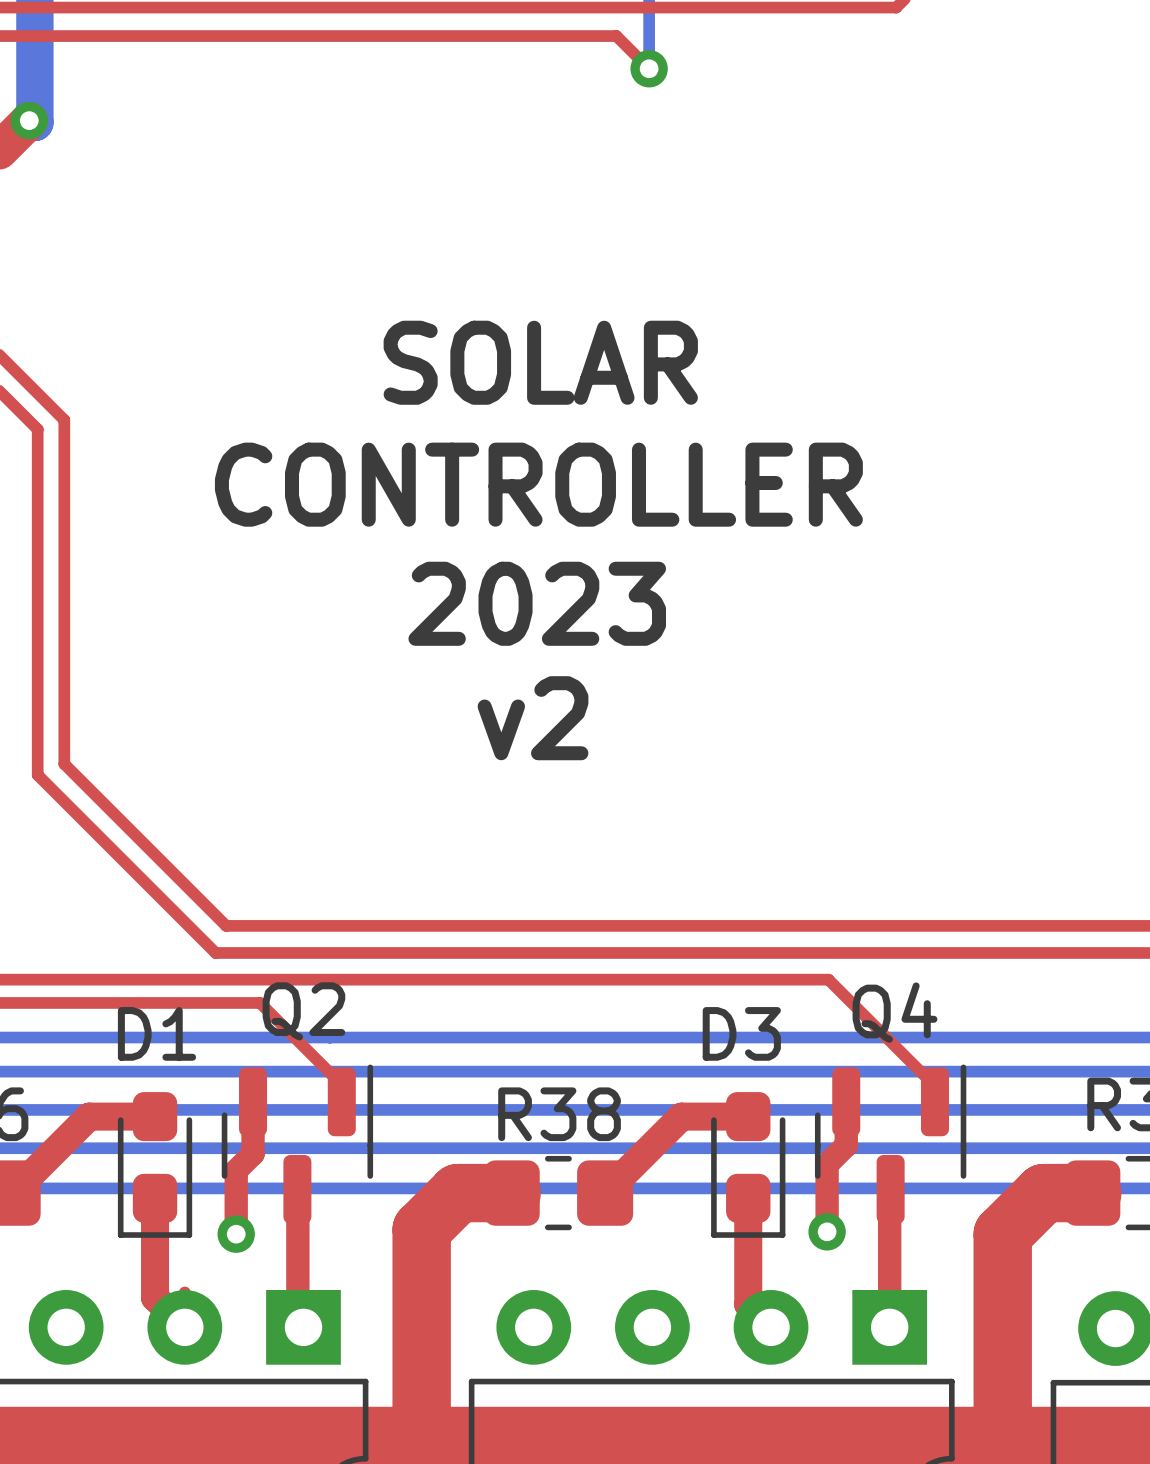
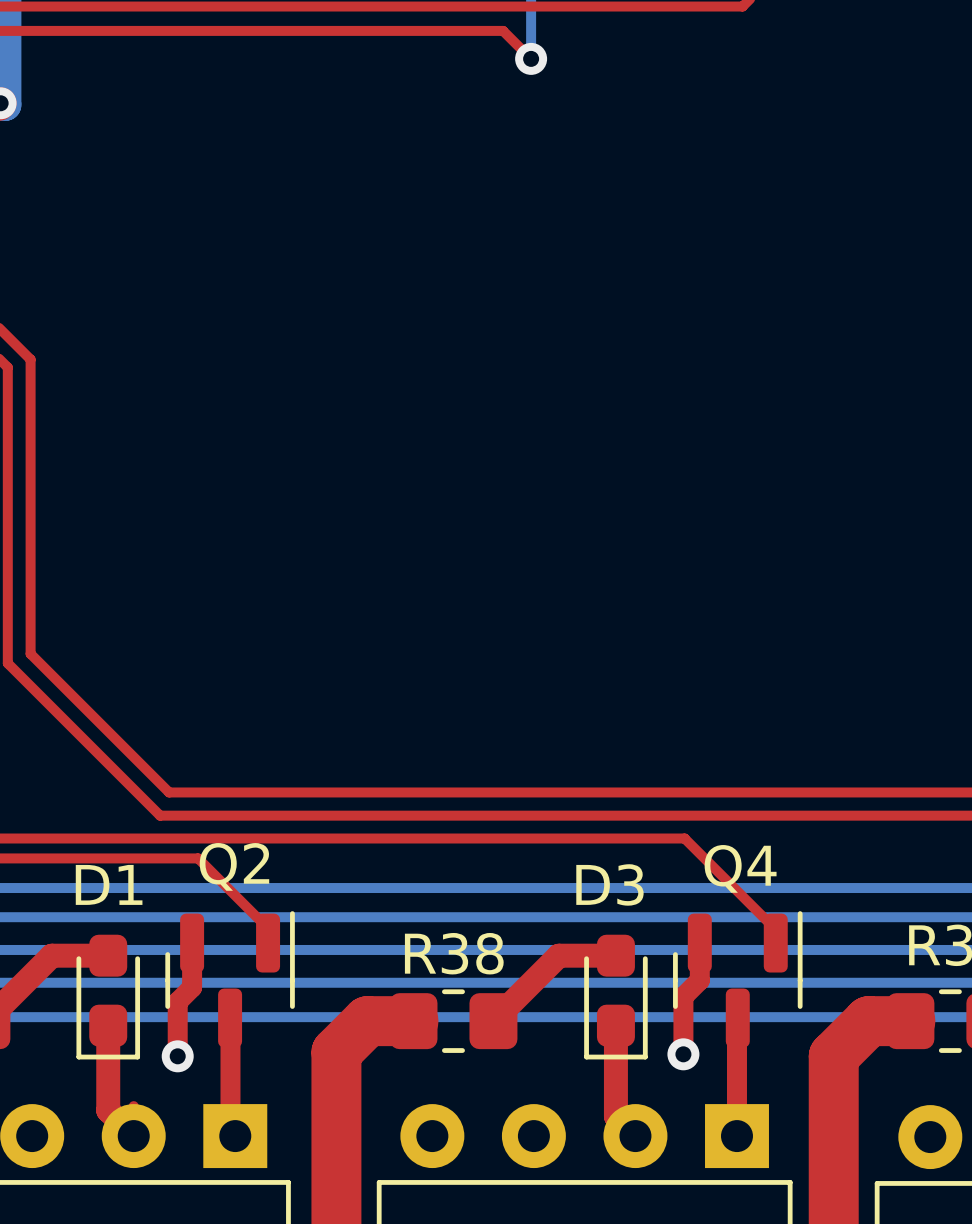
text: SOLAR (540, 362) -> none
text: CONTROLLER (538, 484) -> none
text: 2023 (537, 603) -> none
text: v2 (533, 718) -> none

